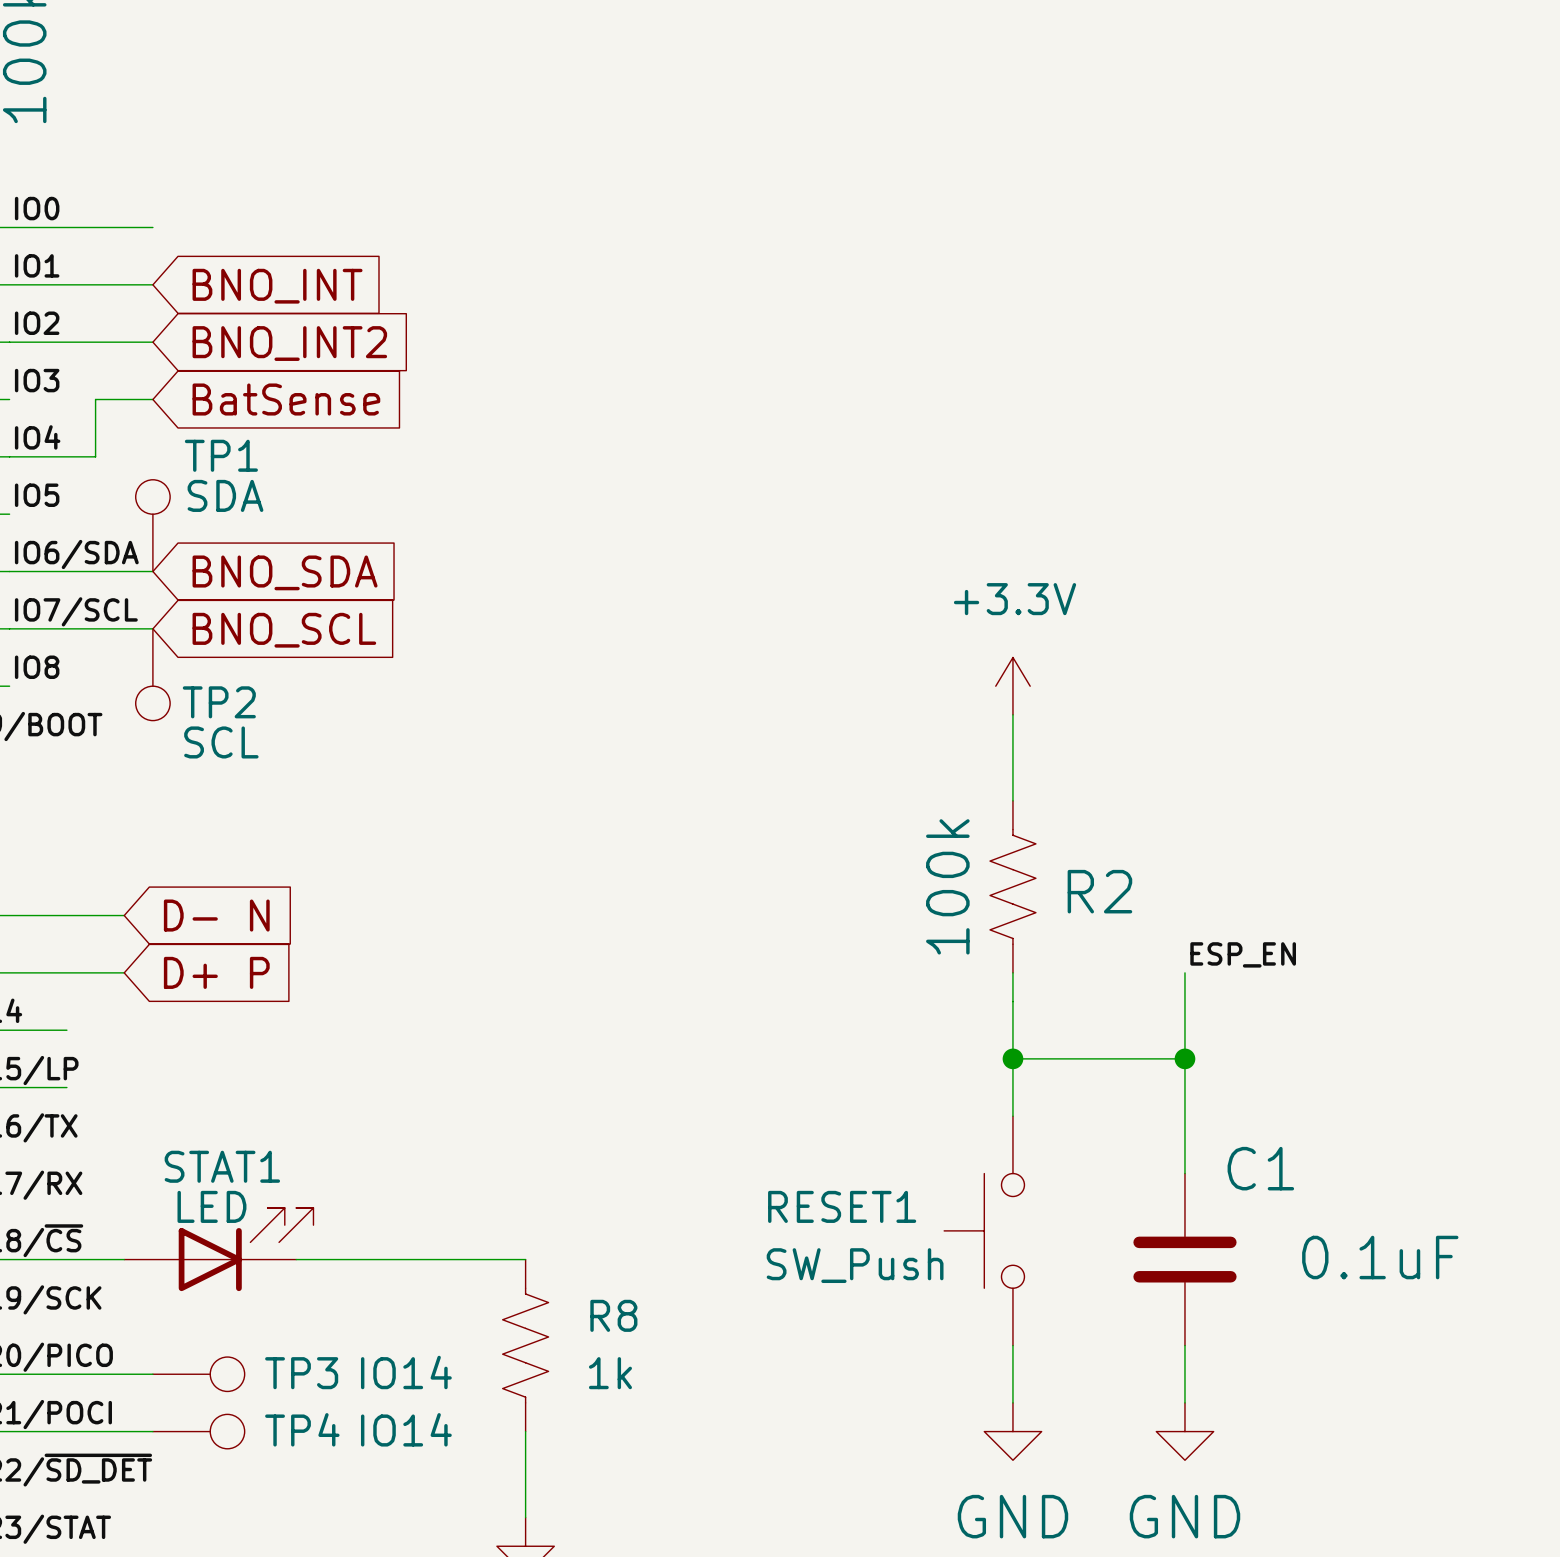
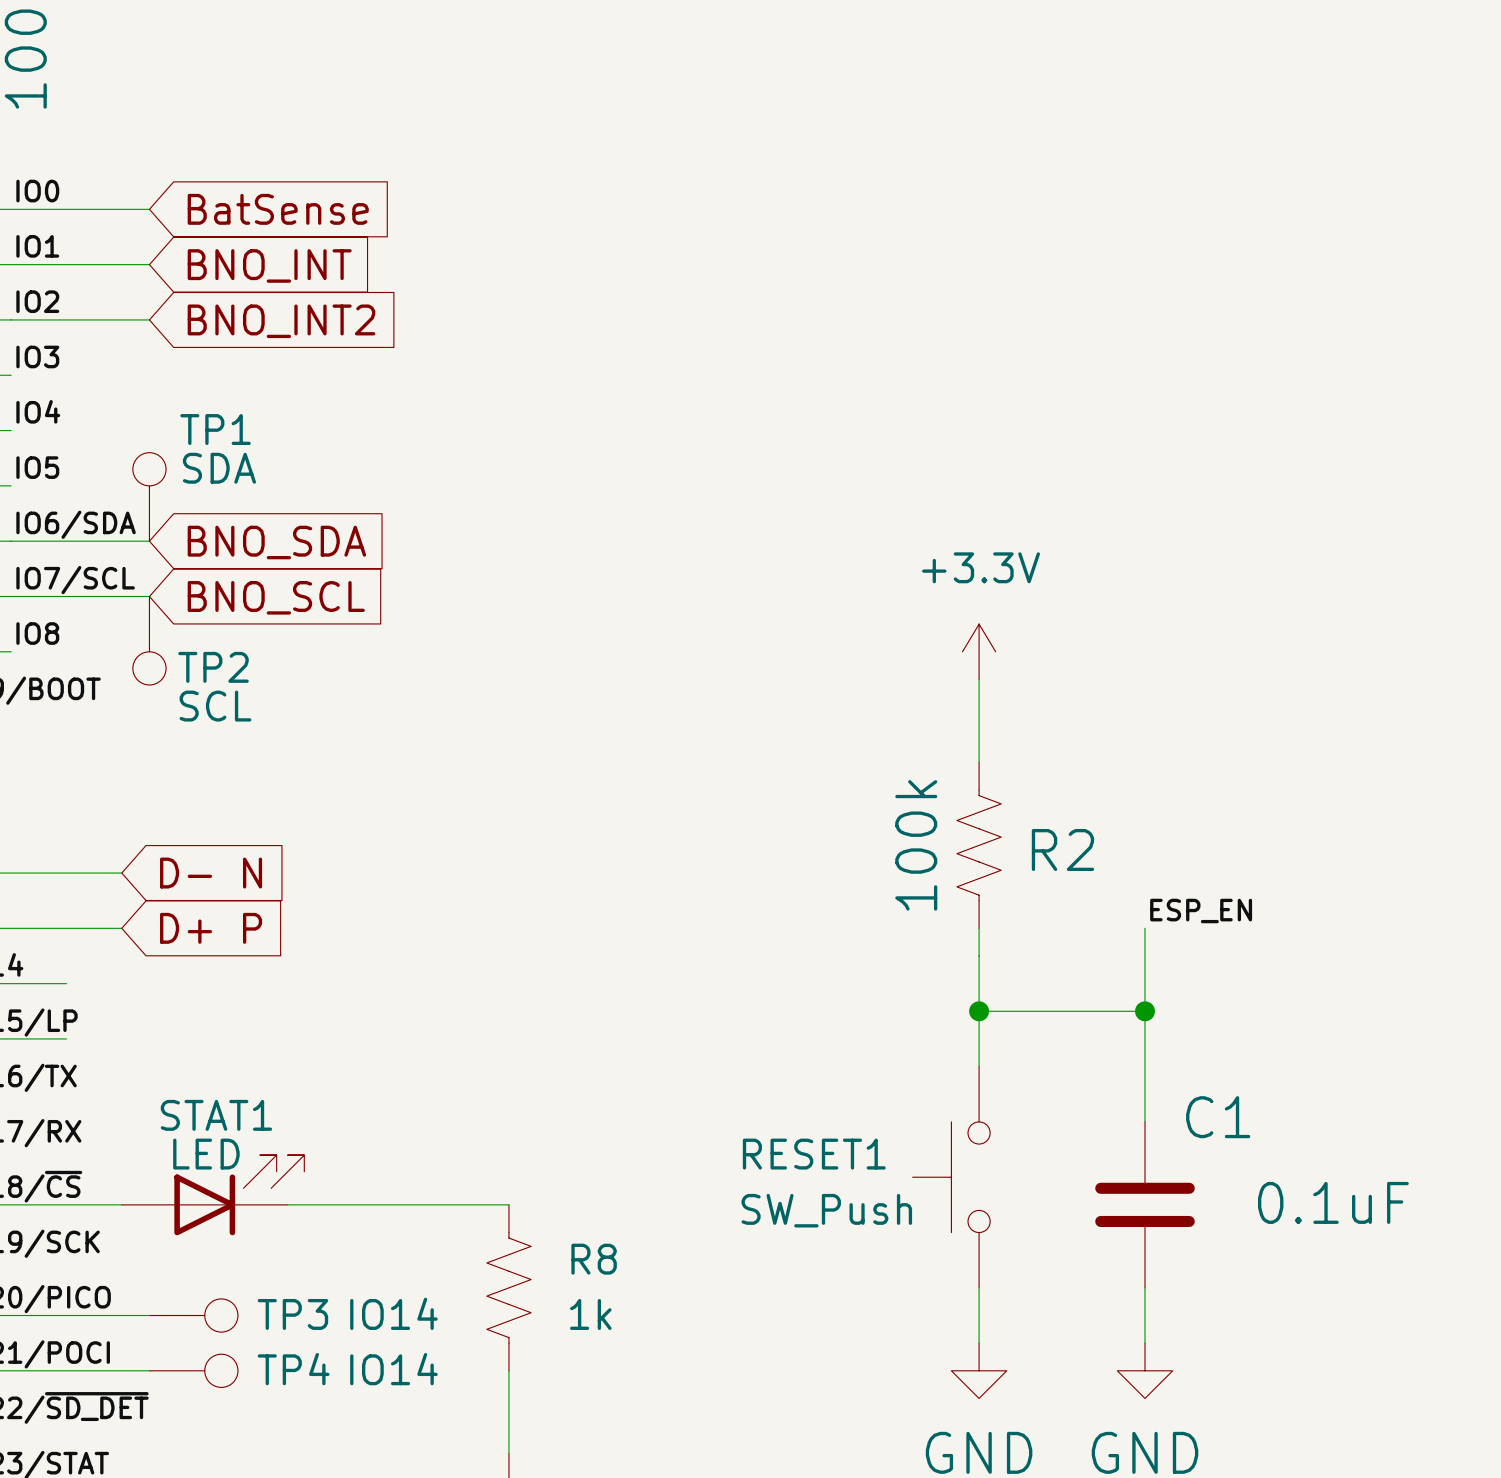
wire: (152, 399) (95, 399) (95, 456) (9, 456) -> none
global label position: BatSense (286, 399) -> BatSense (278, 209)

